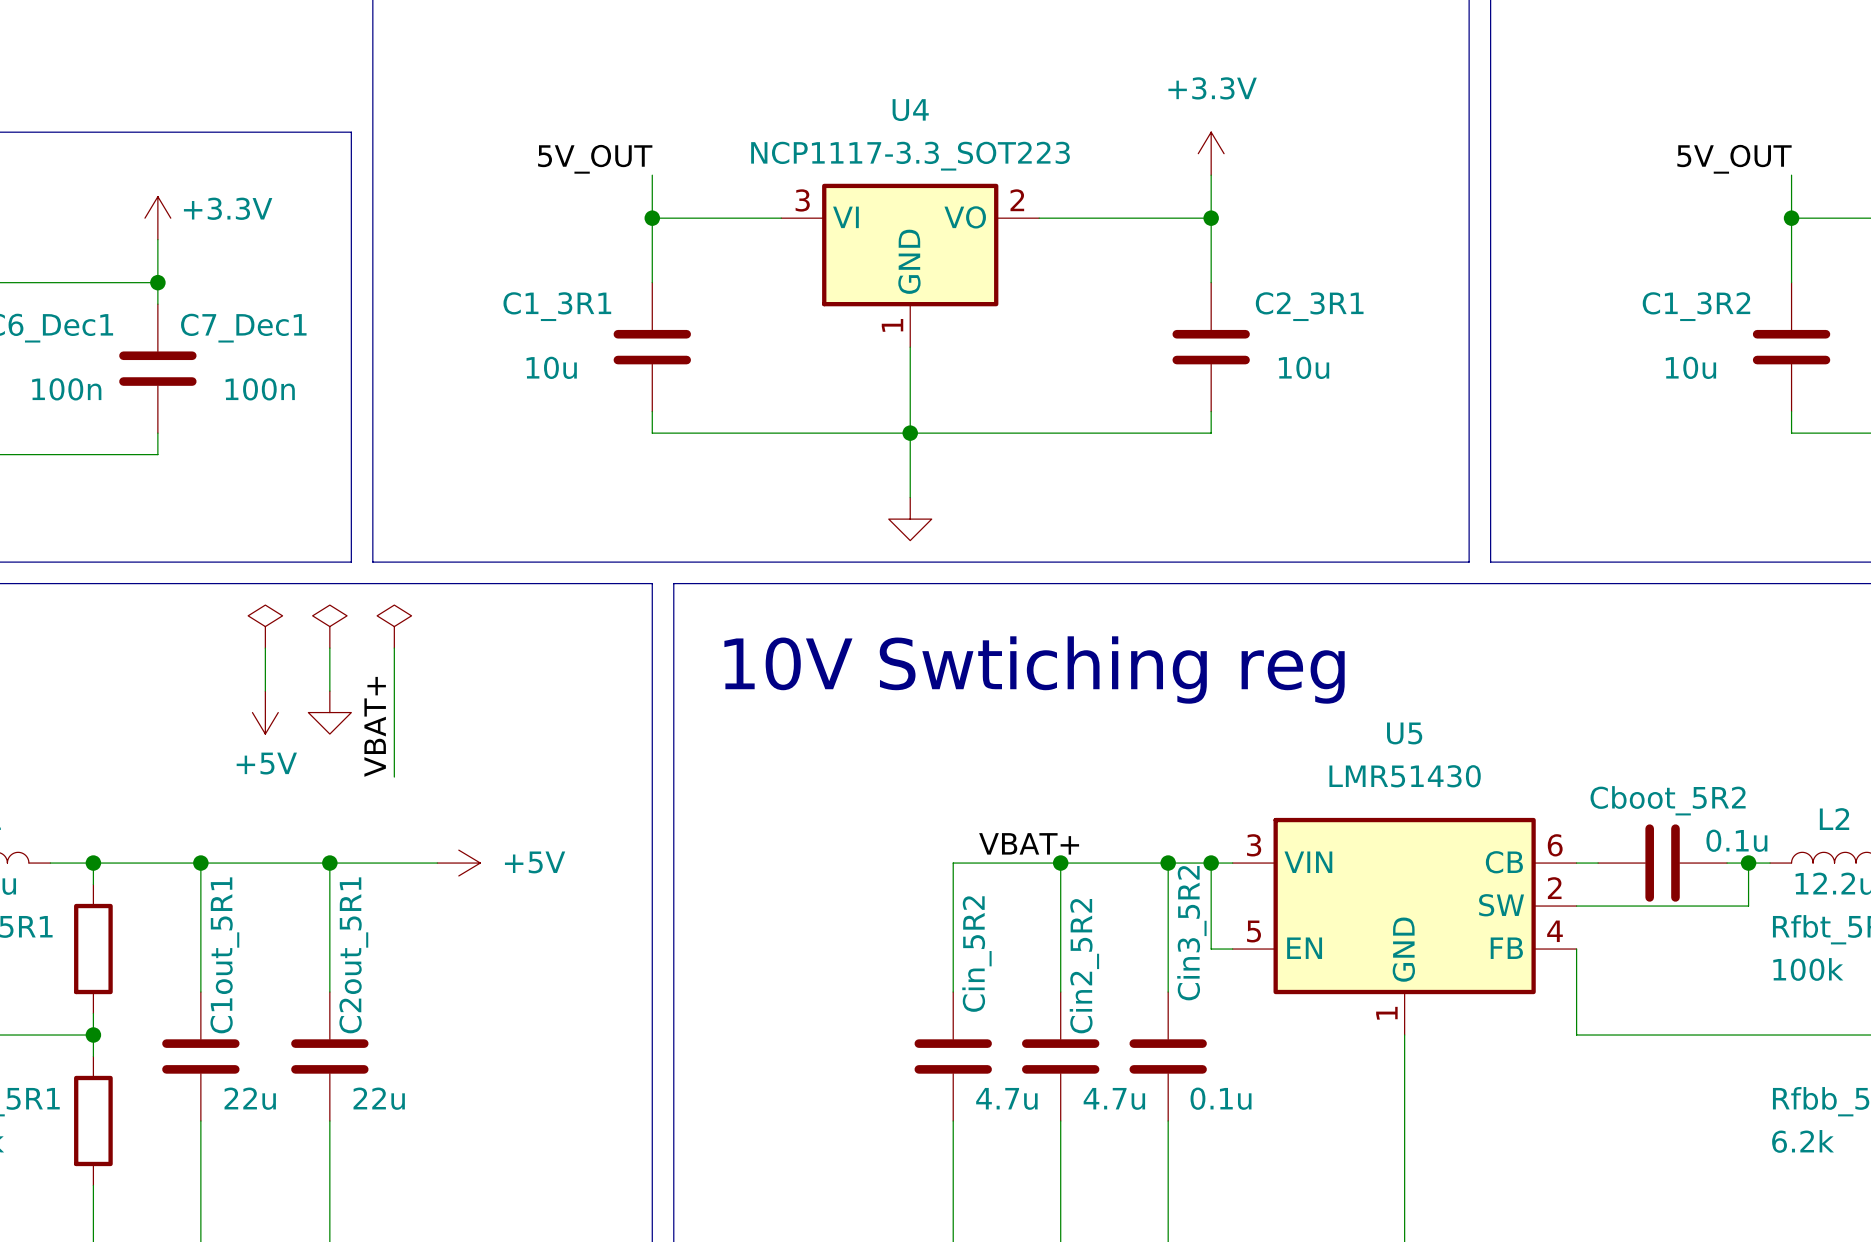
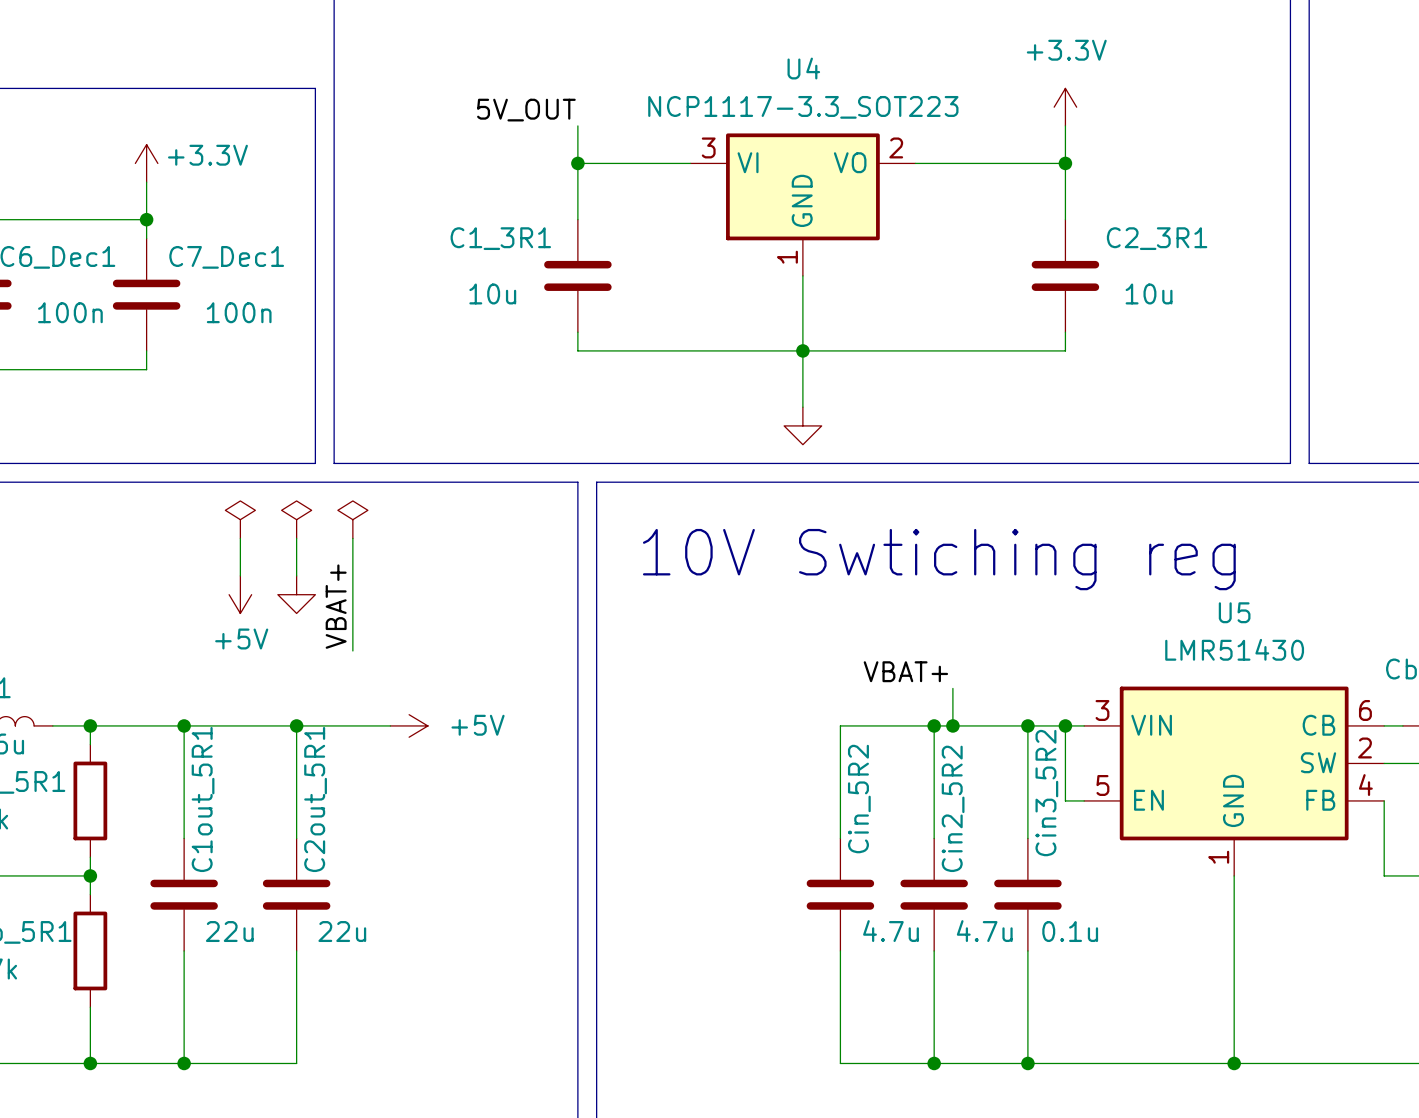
wire: none -> (952, 688) (952, 725)
label position: VBAT+ (1029, 843) -> VBAT+ (905, 671)
junction: none -> (952, 725)

